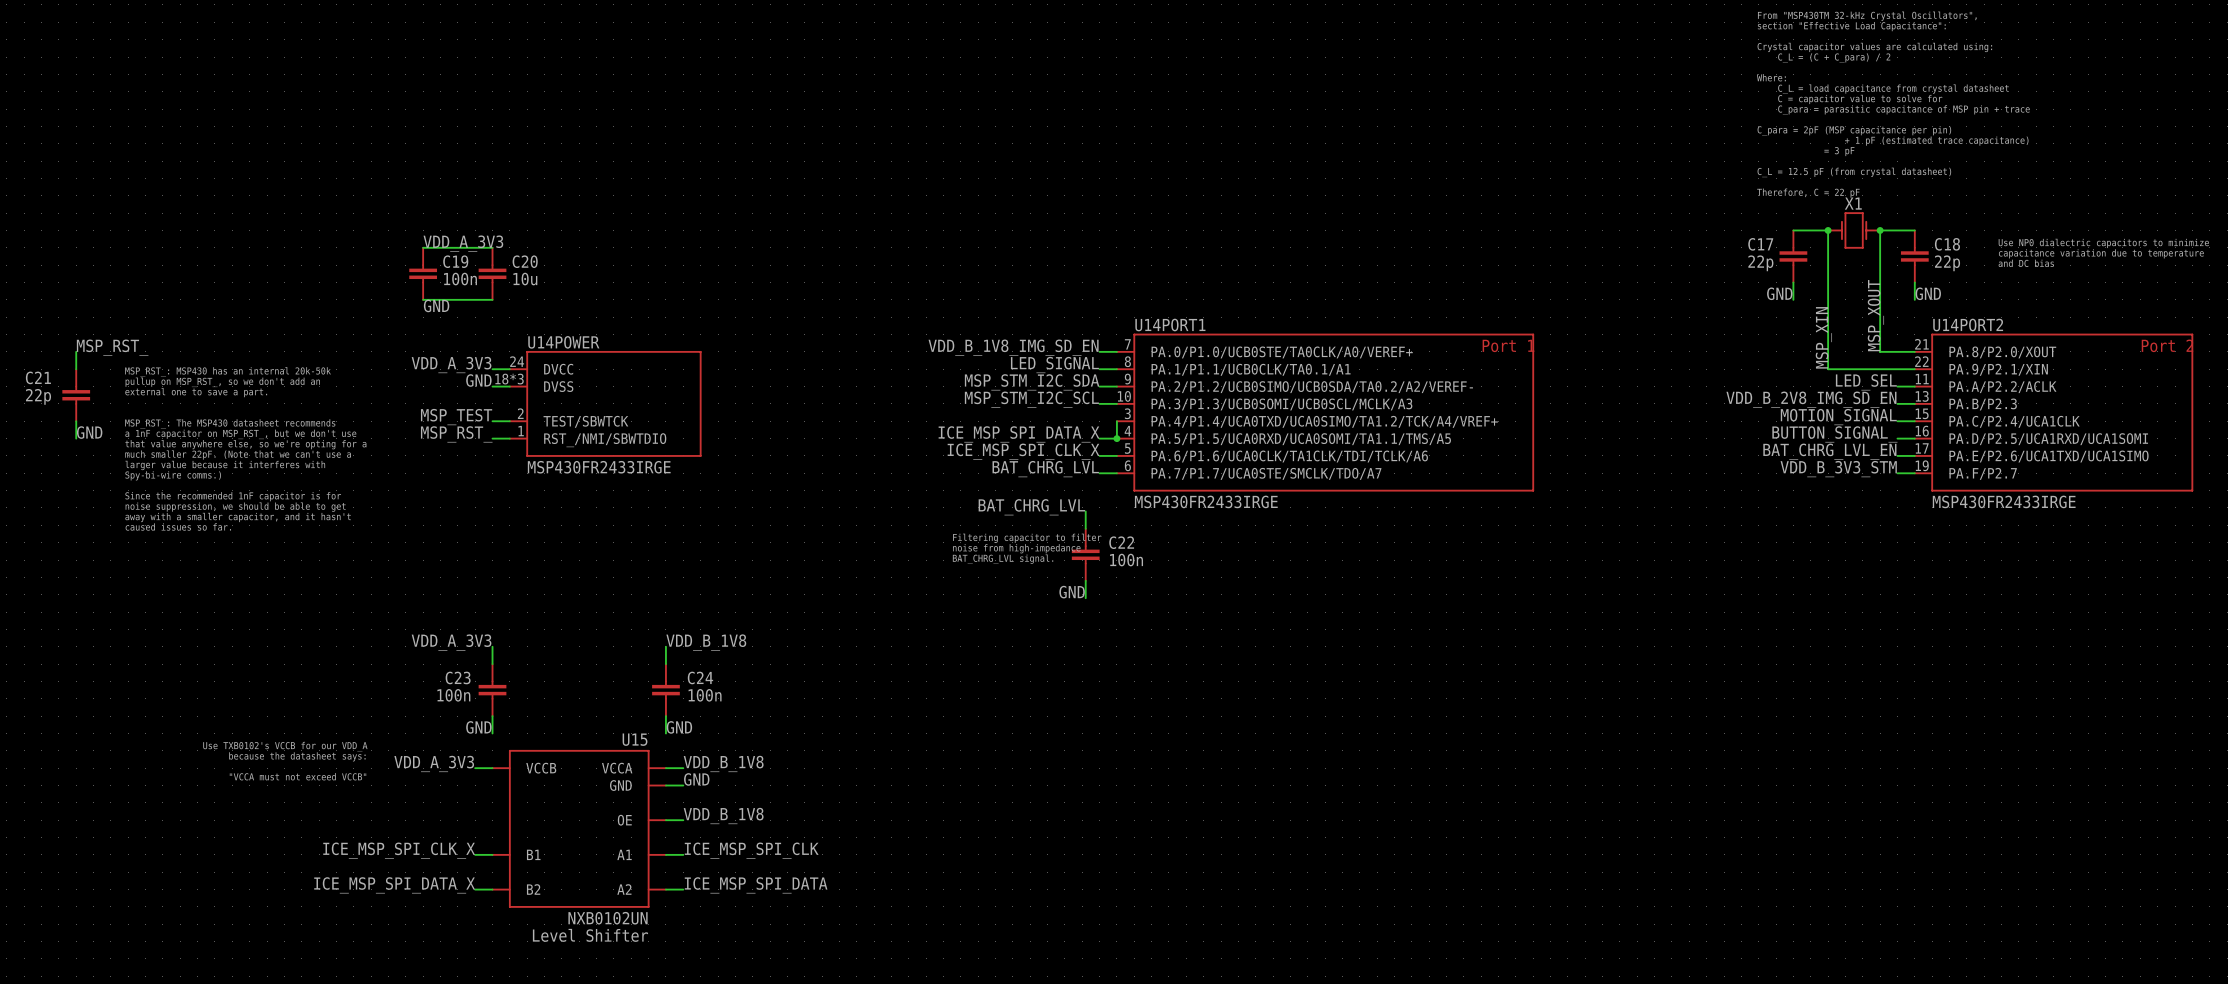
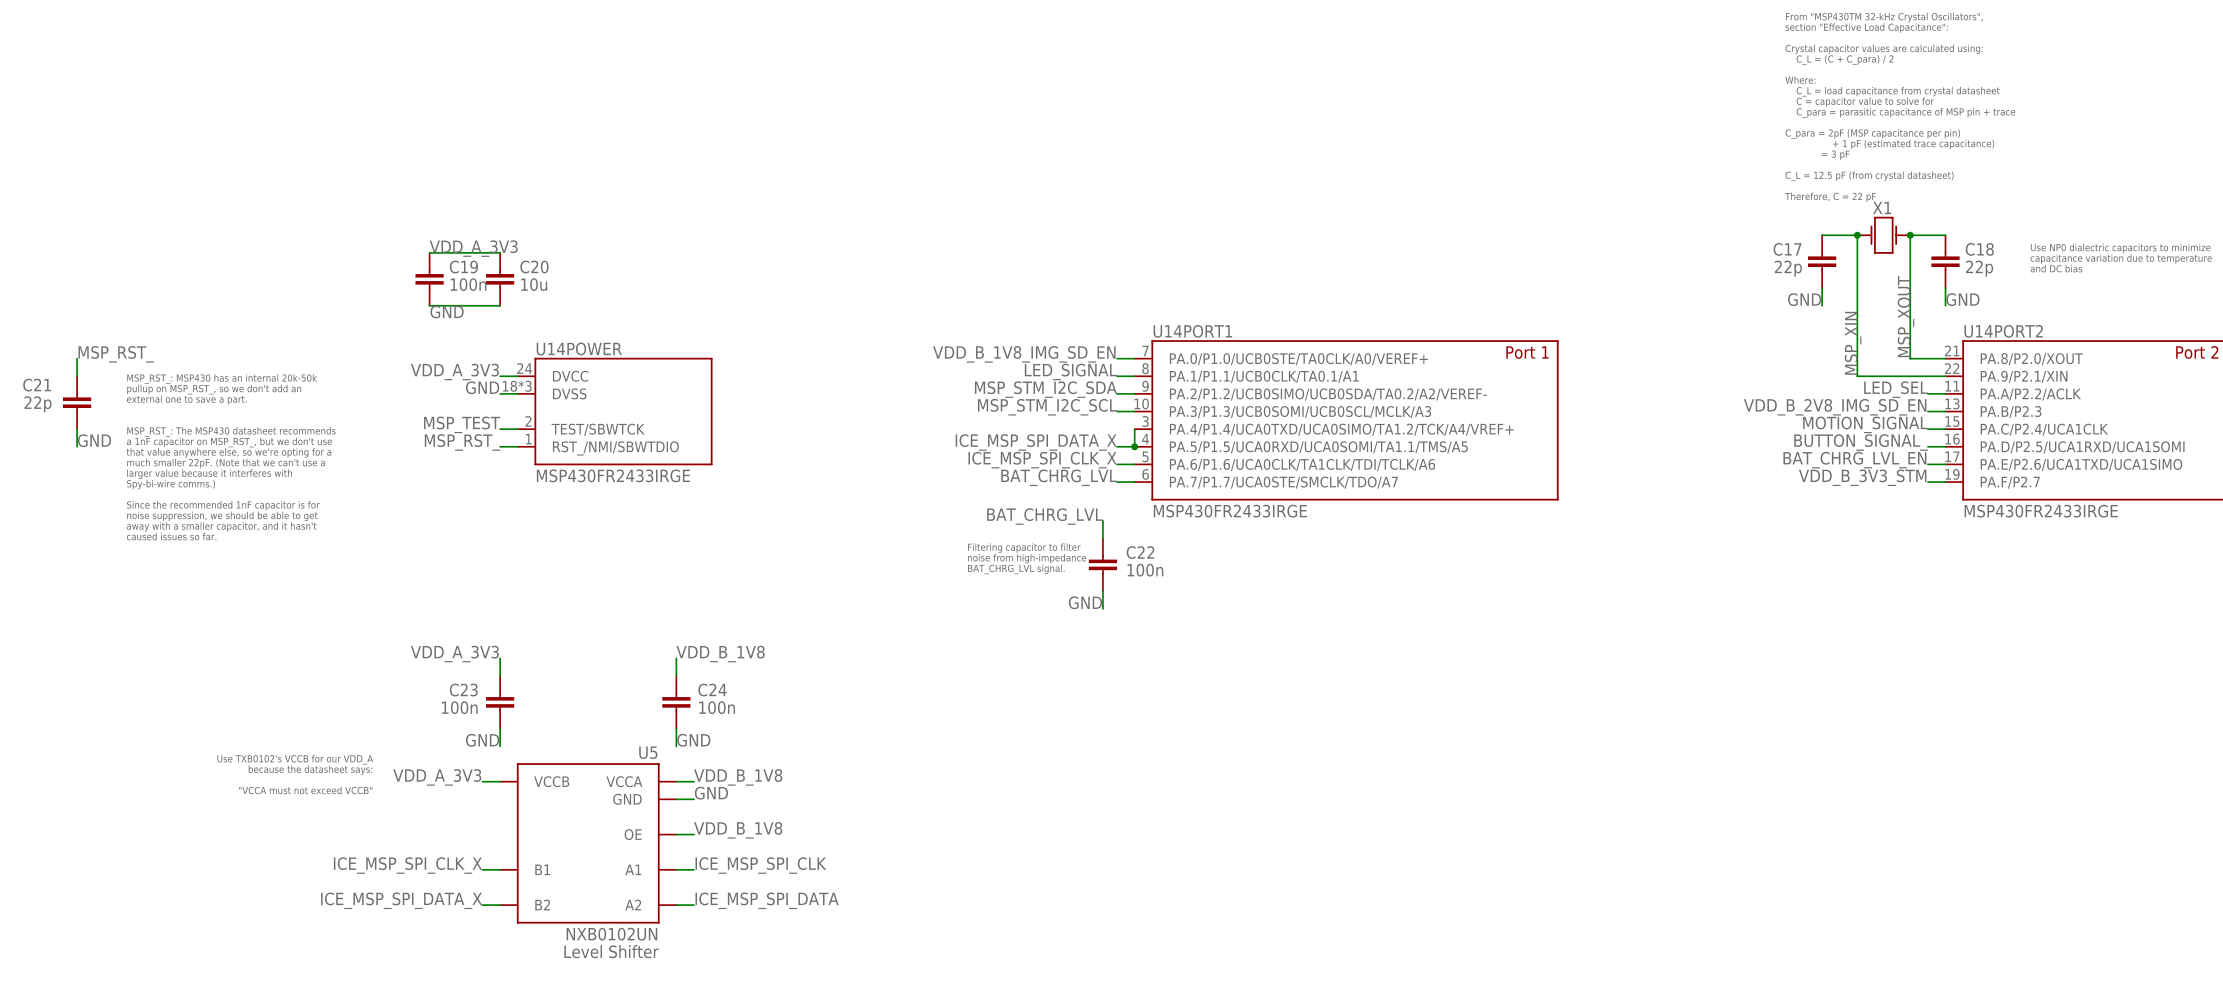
U15 name: U15 (635, 739) -> U5 (648, 752)

